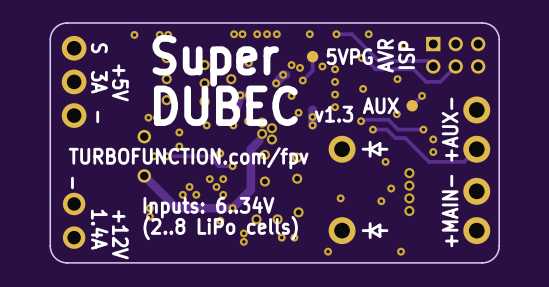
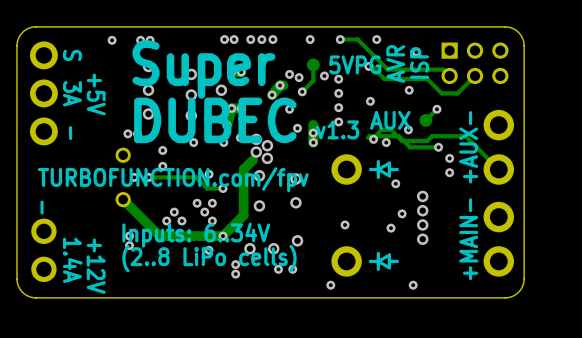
via: (361, 121) -> none
via: none -> (373, 139)
via: none -> (386, 142)
track: (372, 129) (386, 129) (395, 138) (405, 138) (429, 161) (464, 161) (476, 149) -> (373, 139) (381, 129) (391, 129) (402, 140) (427, 140) (432, 136) (465, 136) (498, 169)
via: (372, 129) -> none

